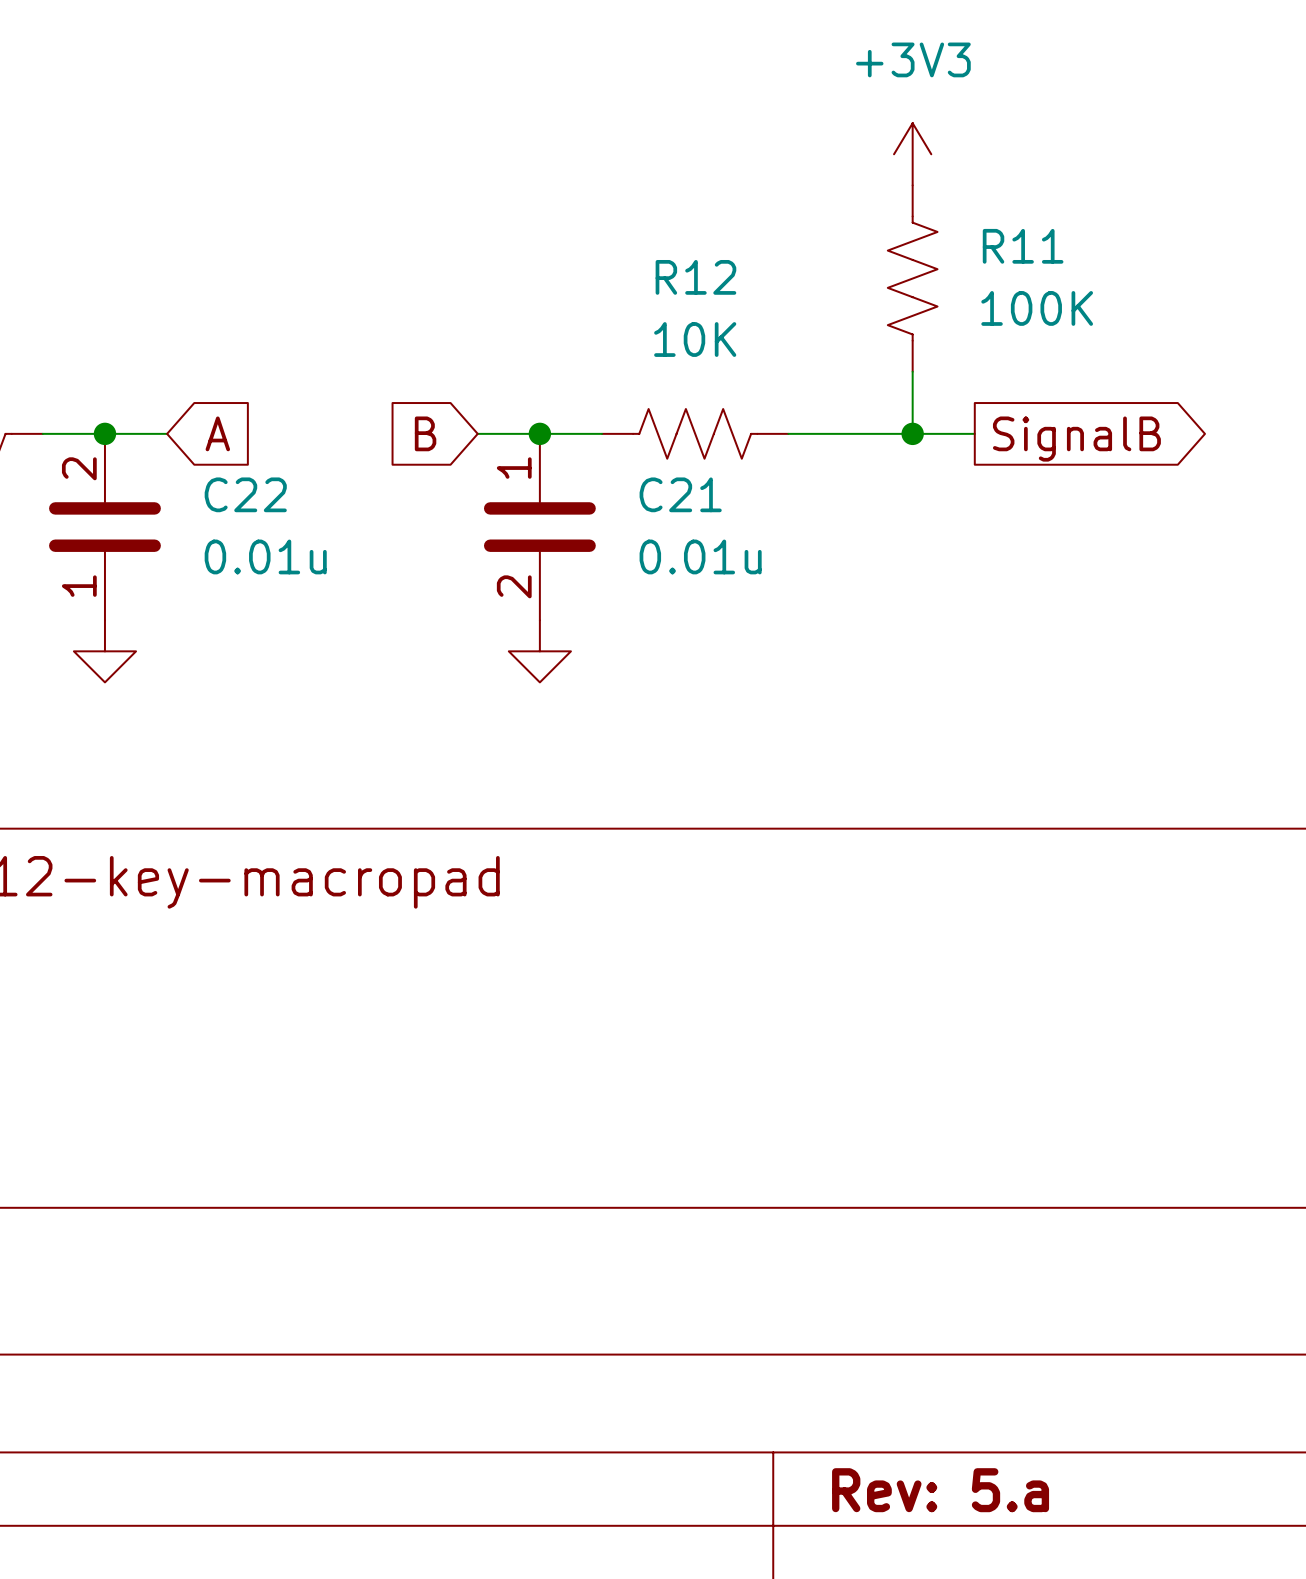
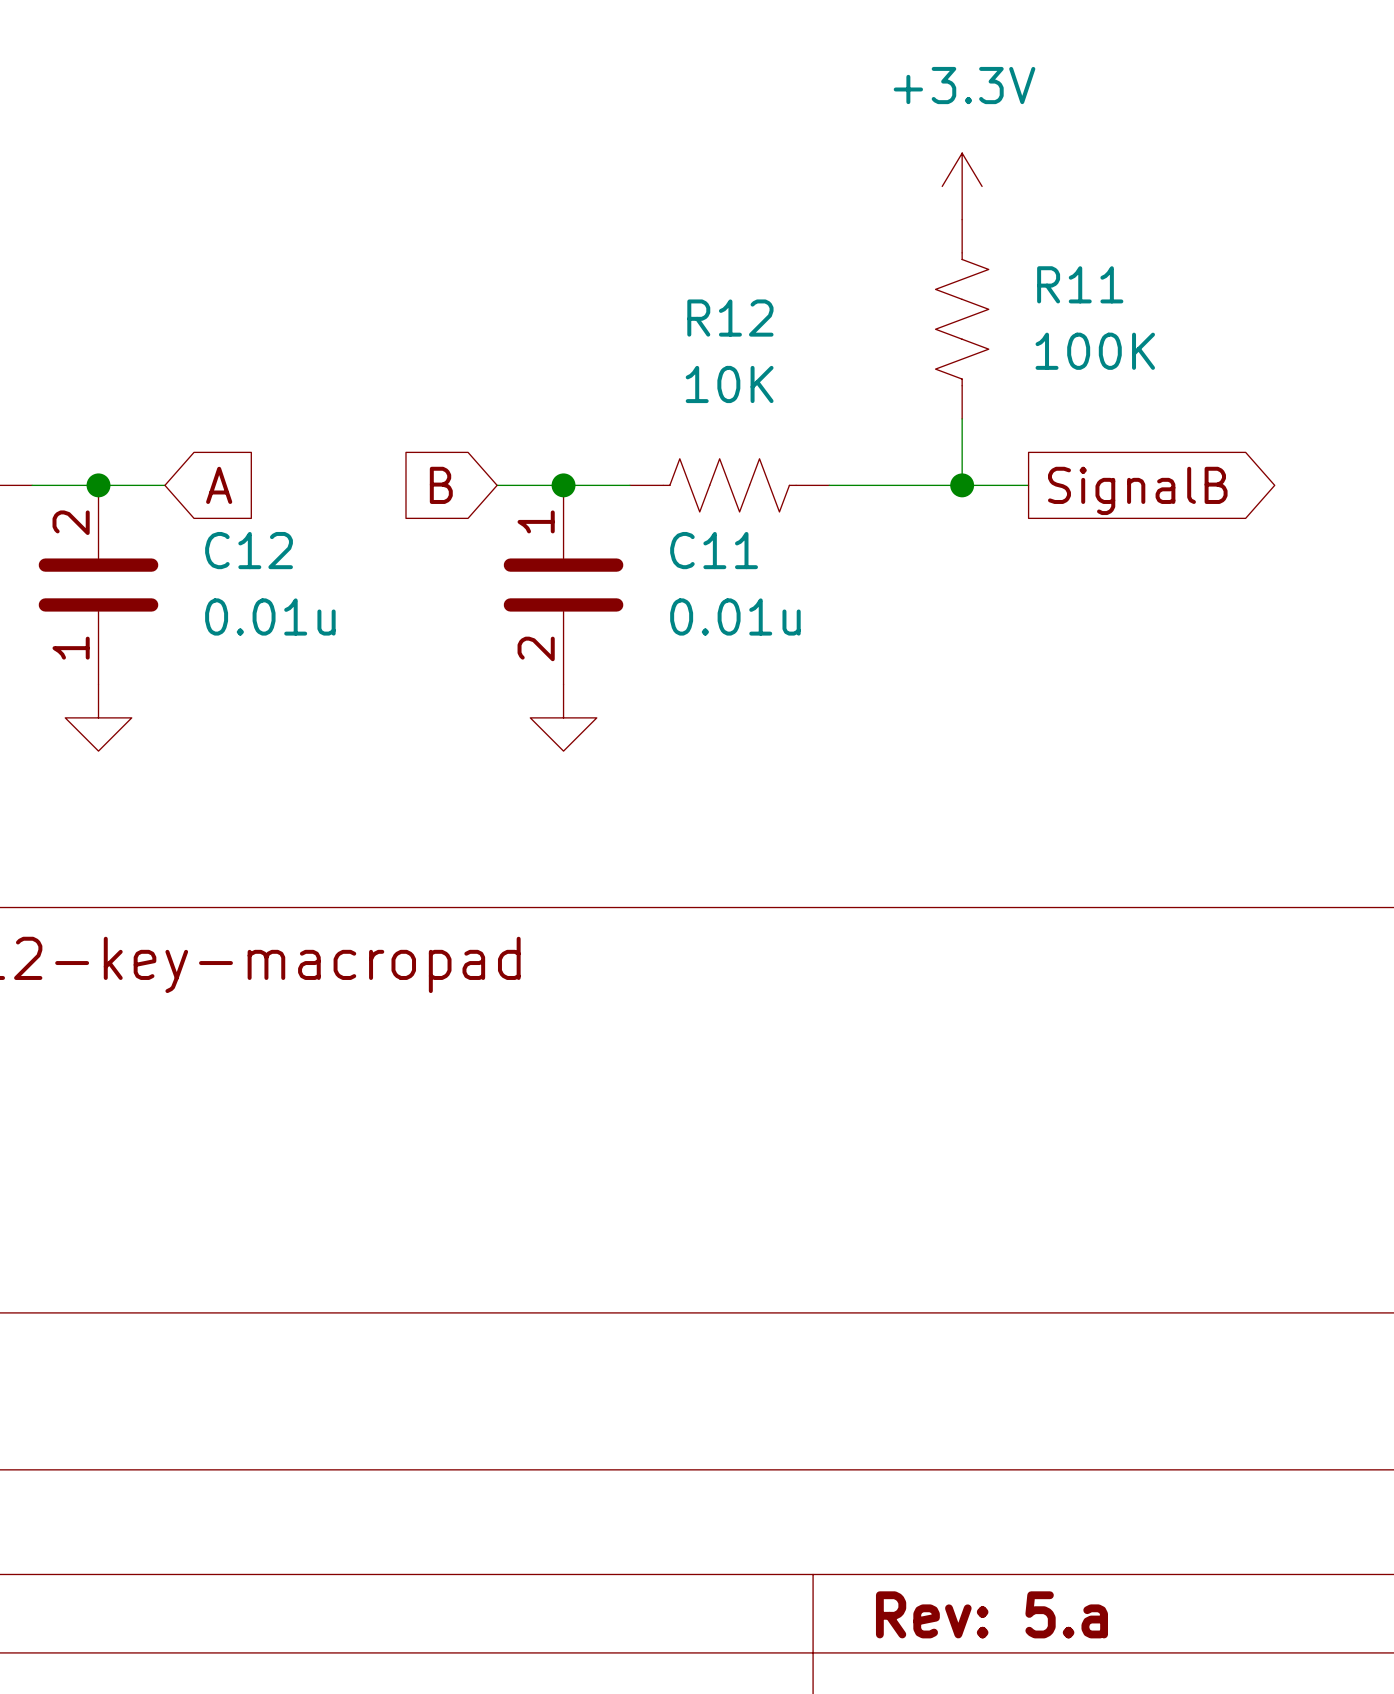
power symbol: +3V3 (912, 154) -> +3.3V (962, 186)
C22 name: C22 (245, 494) -> C12 (249, 550)
C21 name: C21 (680, 494) -> C11 (714, 550)

